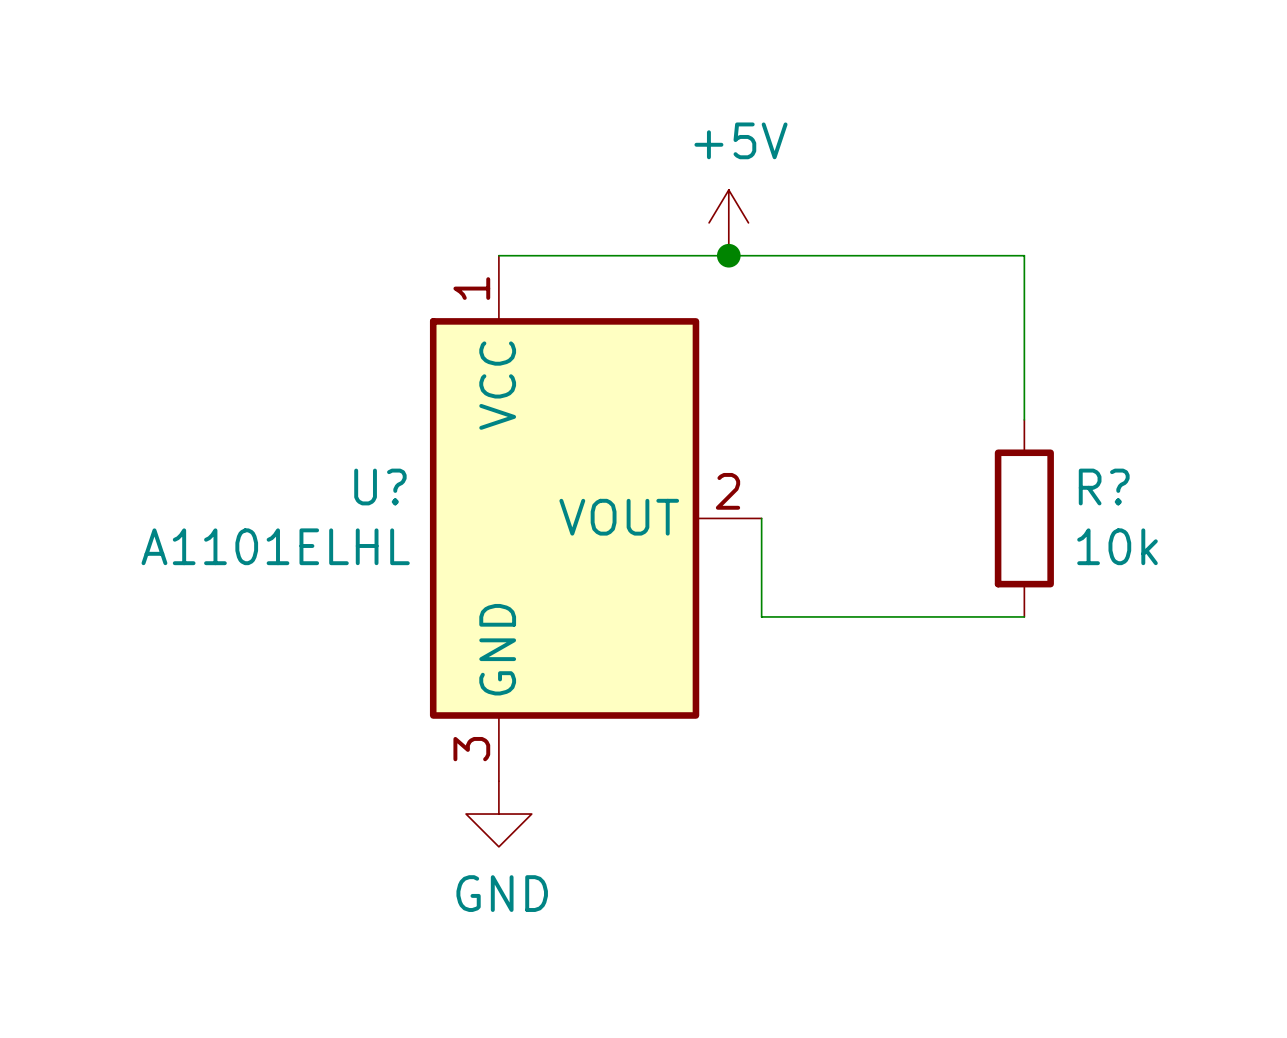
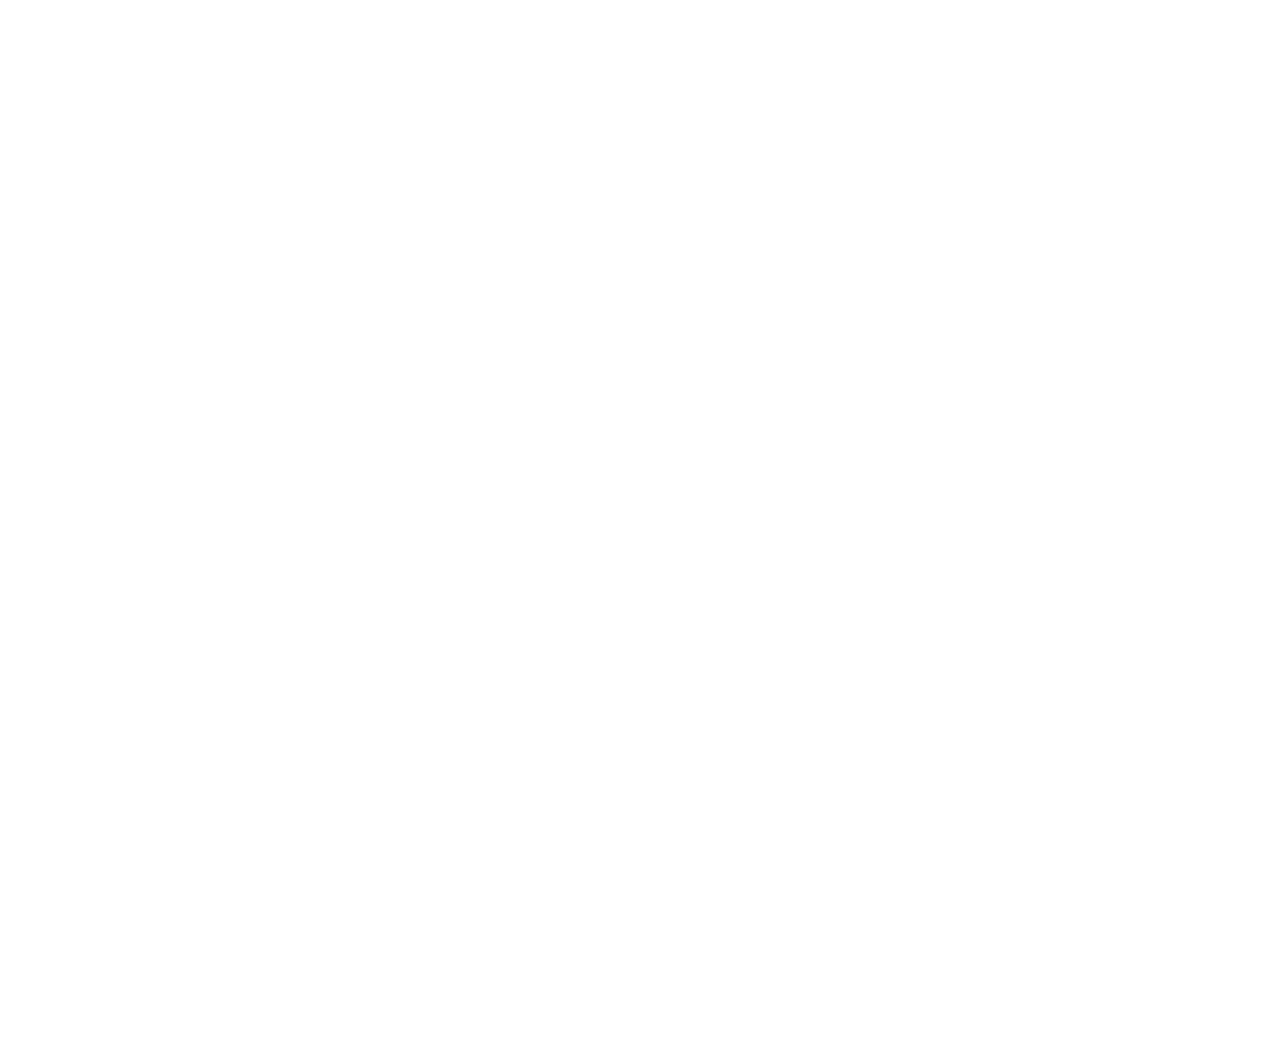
power symbol: +5V (728, 222) -> none
wire: (498, 255) (1024, 255) (1024, 419) -> none
junction: (728, 255) -> none
U?: A1101ELHL (595, 518) -> none
wire: (761, 518) (761, 616) (1024, 616) -> none
R?: 10k (1024, 518) -> none
power symbol: GND (498, 814) -> none

